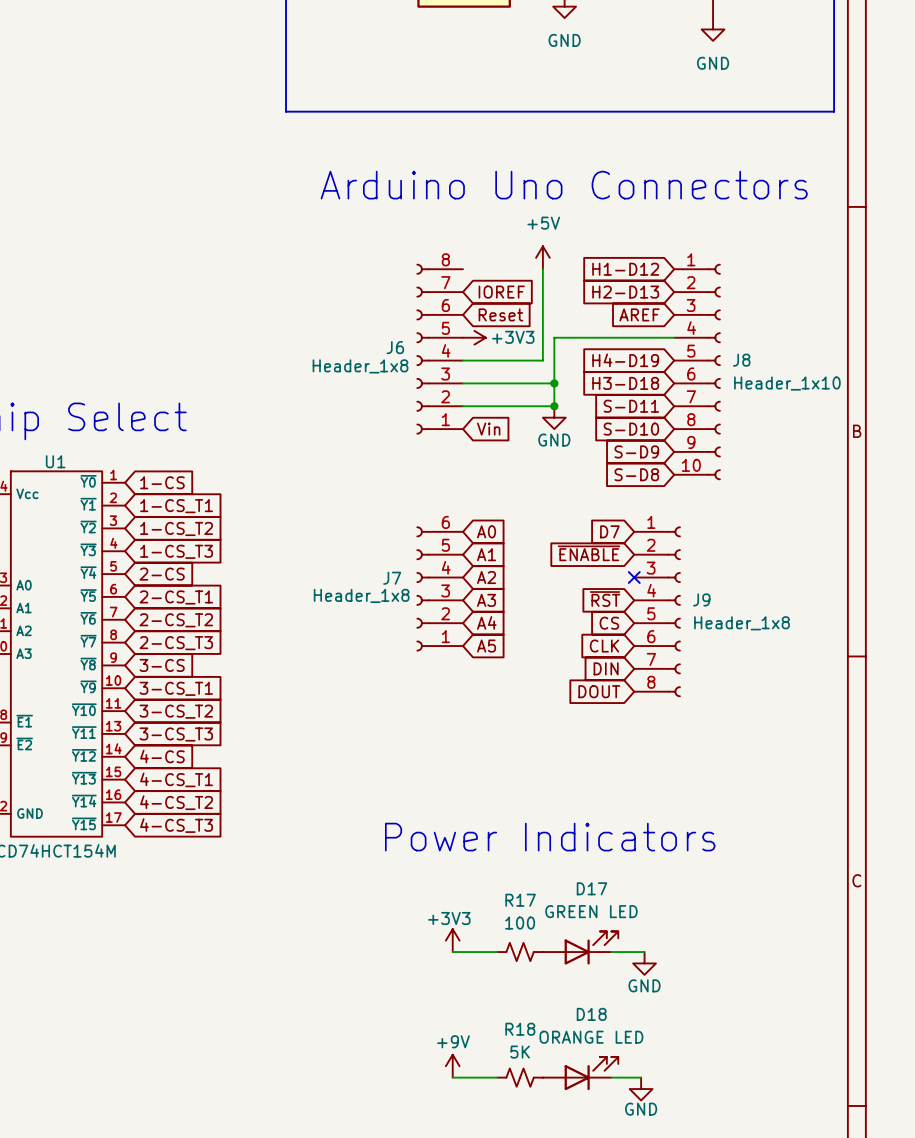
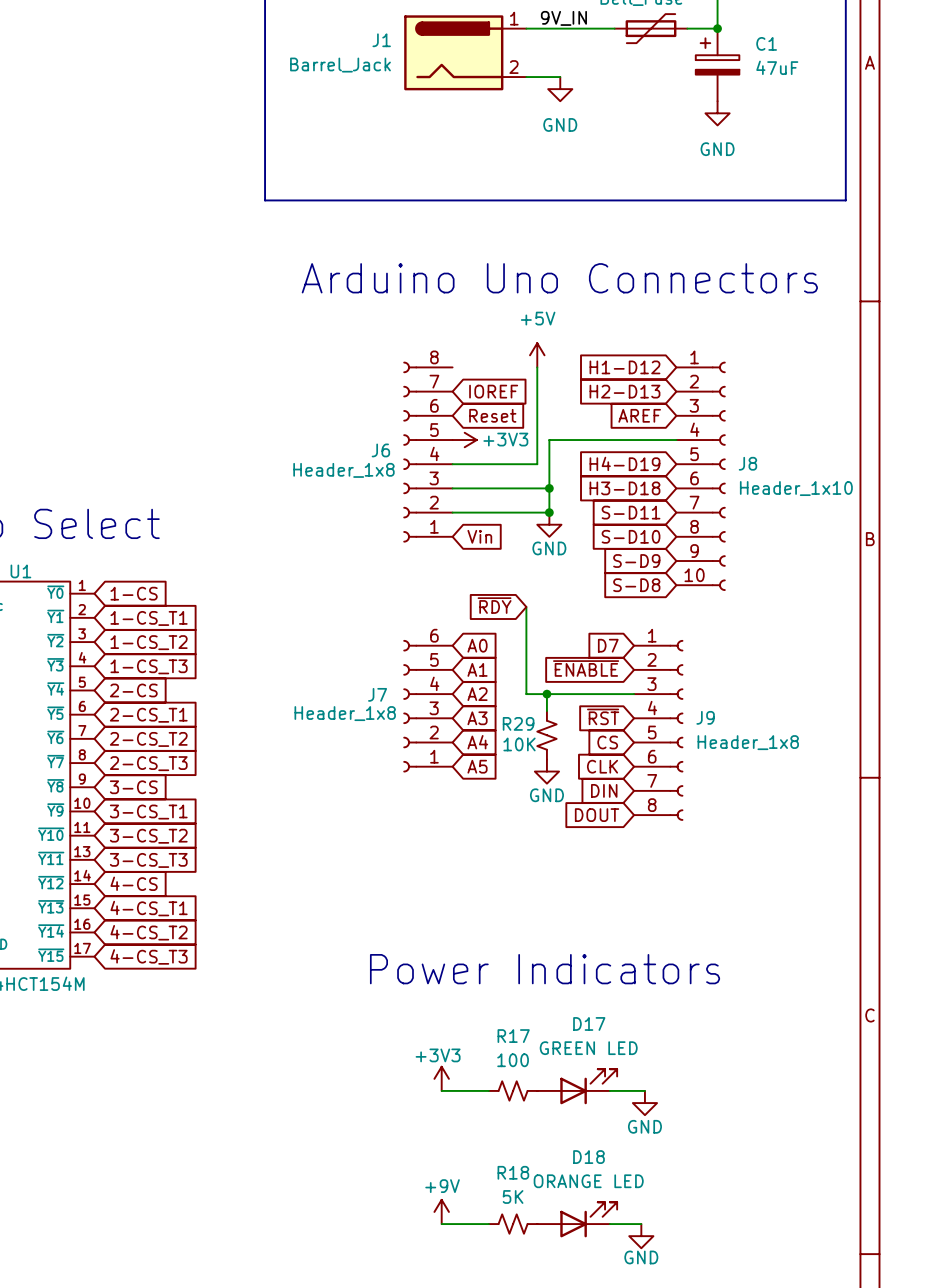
global label: none -> ~{RDY} (494, 605)
wire: none -> (526, 606) (526, 694) (634, 694)
wire: none -> (546, 694) (546, 711)
junction: none -> (546, 694)
no-connect mark: (634, 577) -> none
R29: none -> 10K (546, 735)
power symbol: none -> GND (546, 771)

